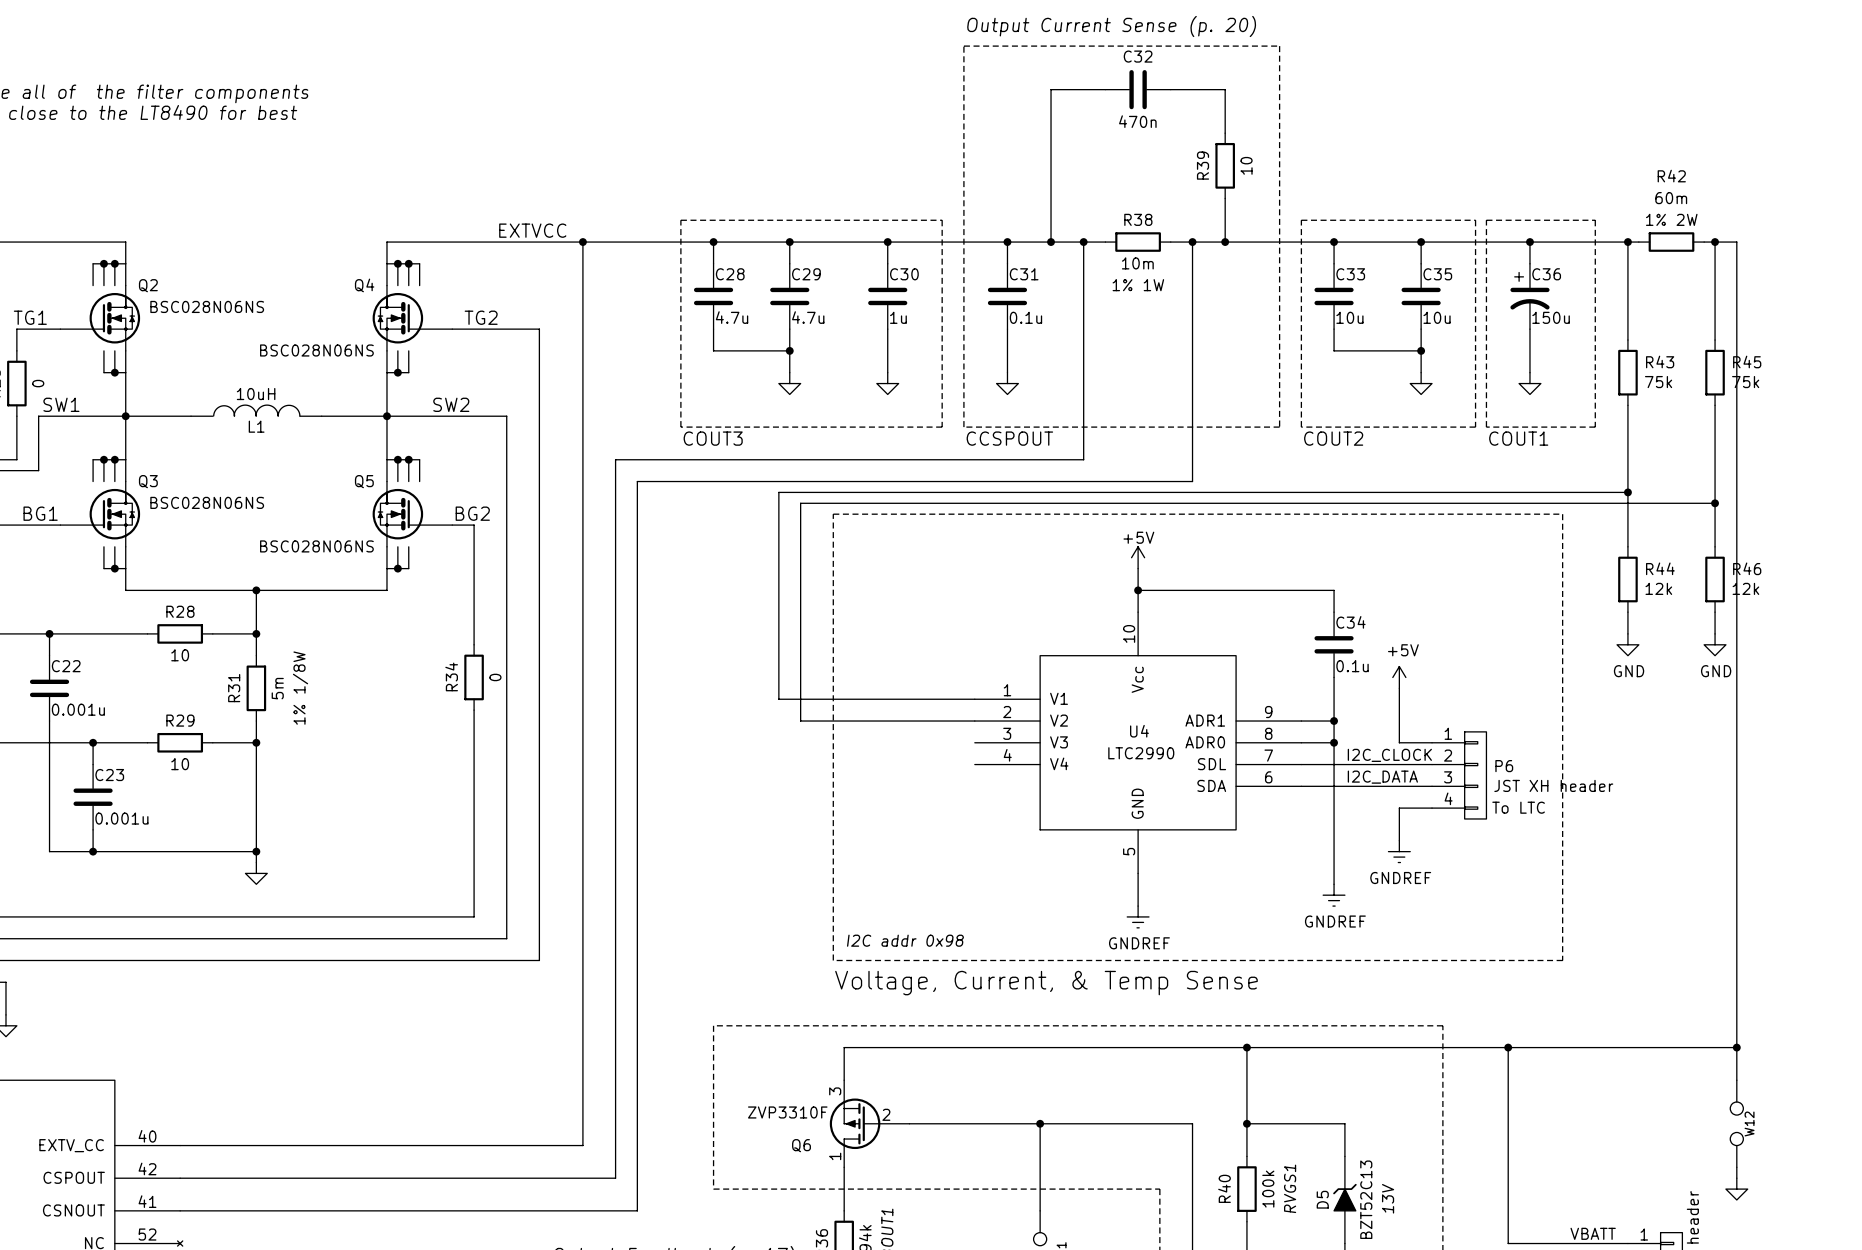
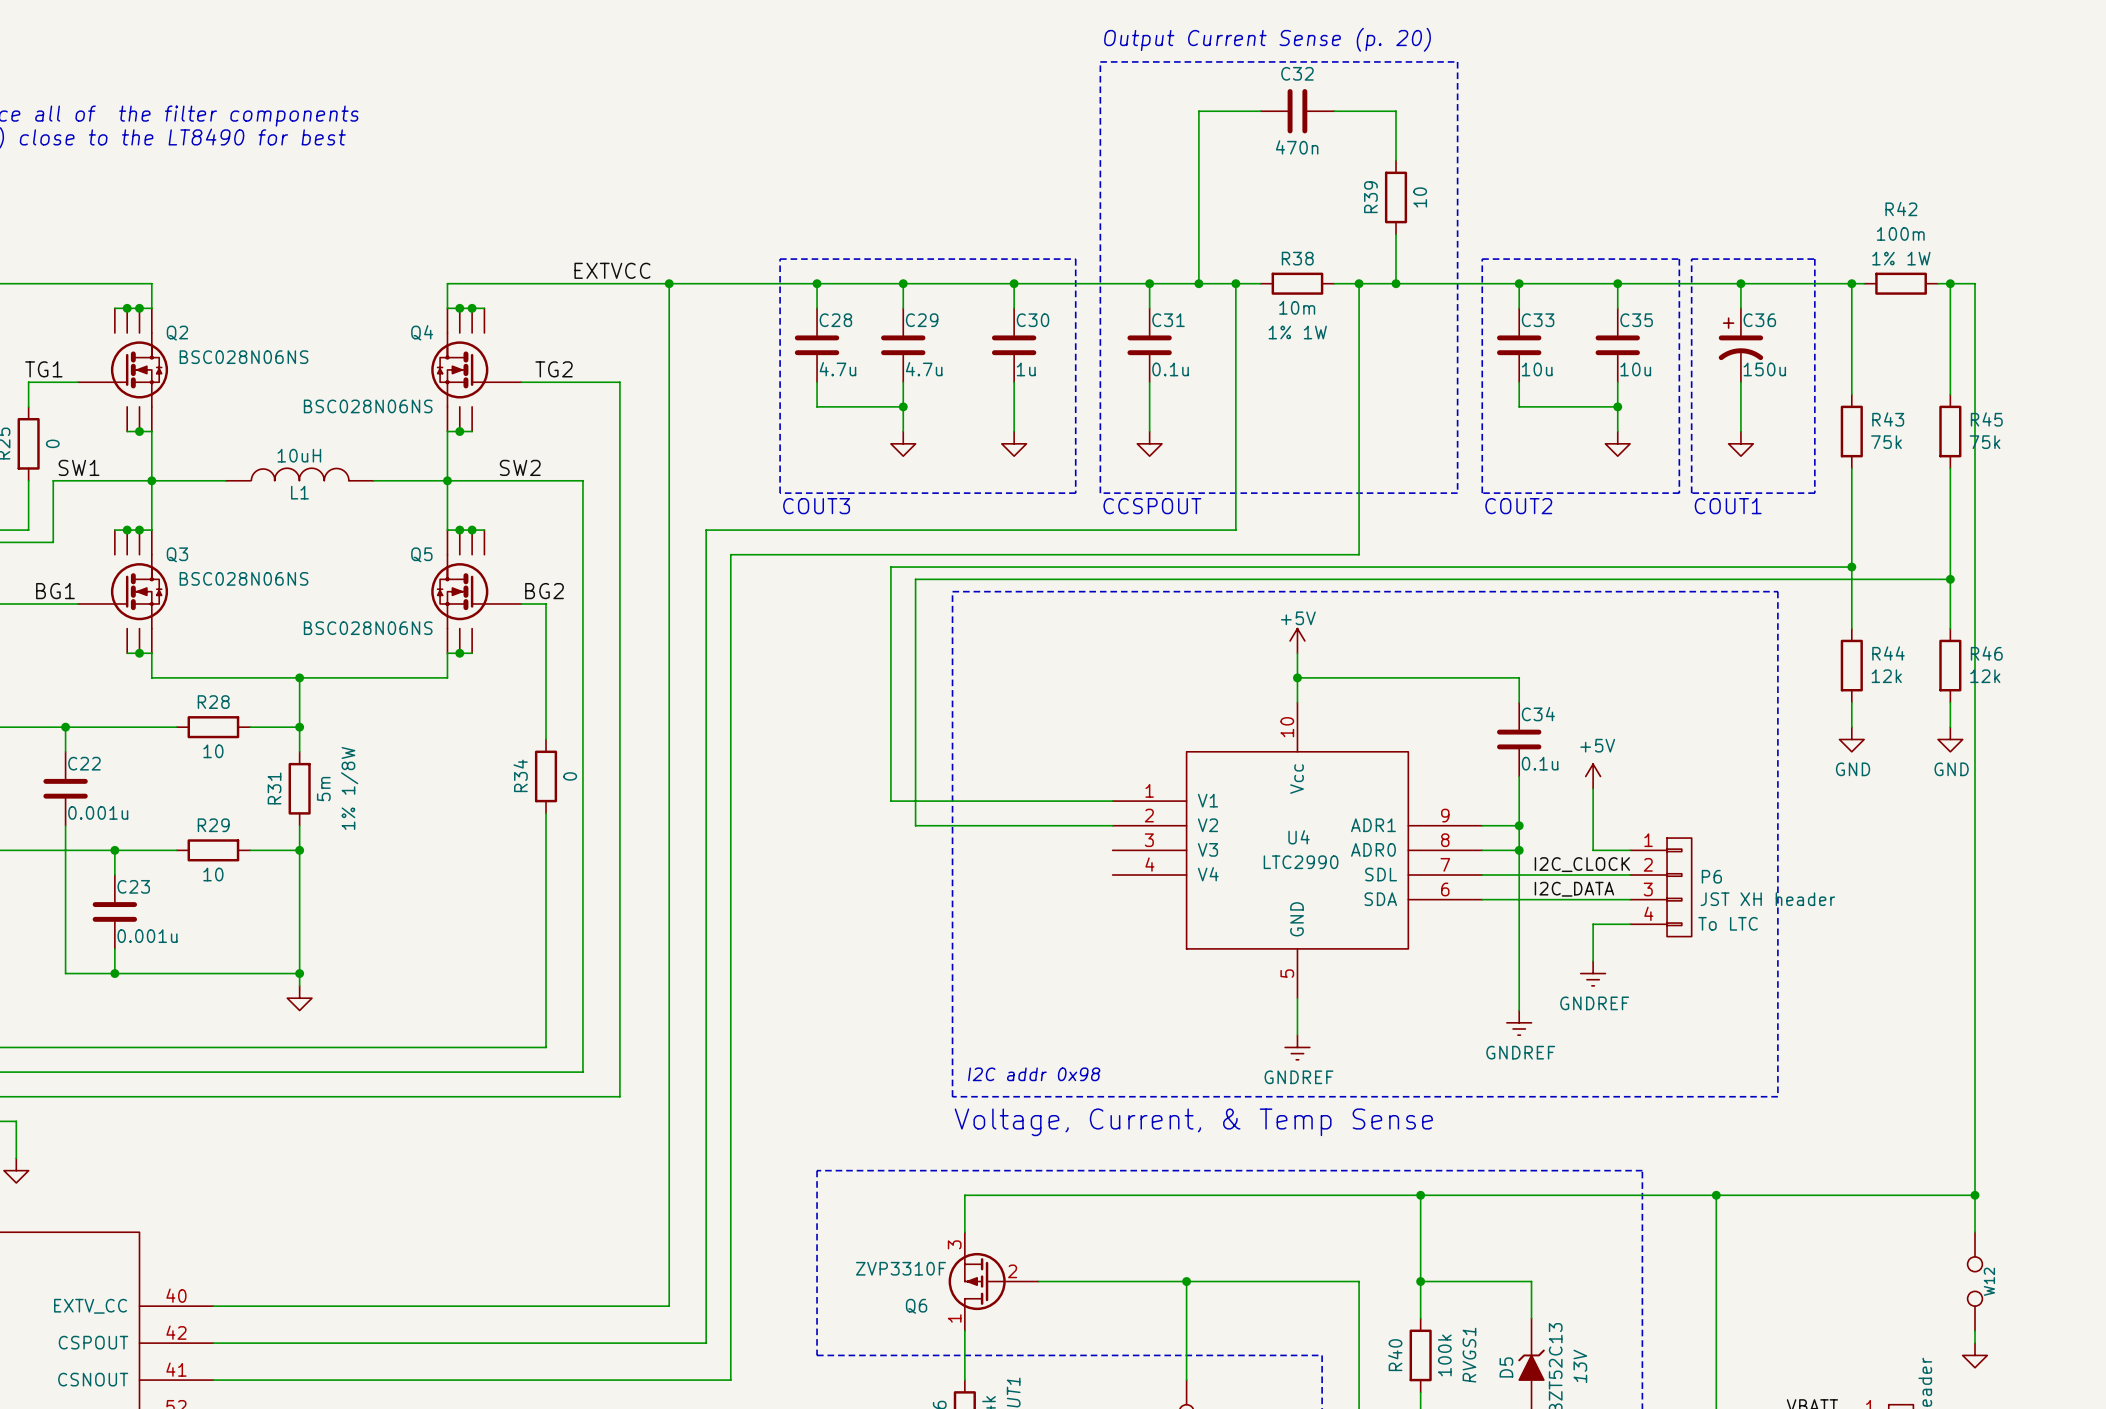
R42 value: 60m (1671, 198) -> 100m (1900, 233)
R42 text: 1% 2W (1671, 219) -> 1% 1W (1901, 258)

